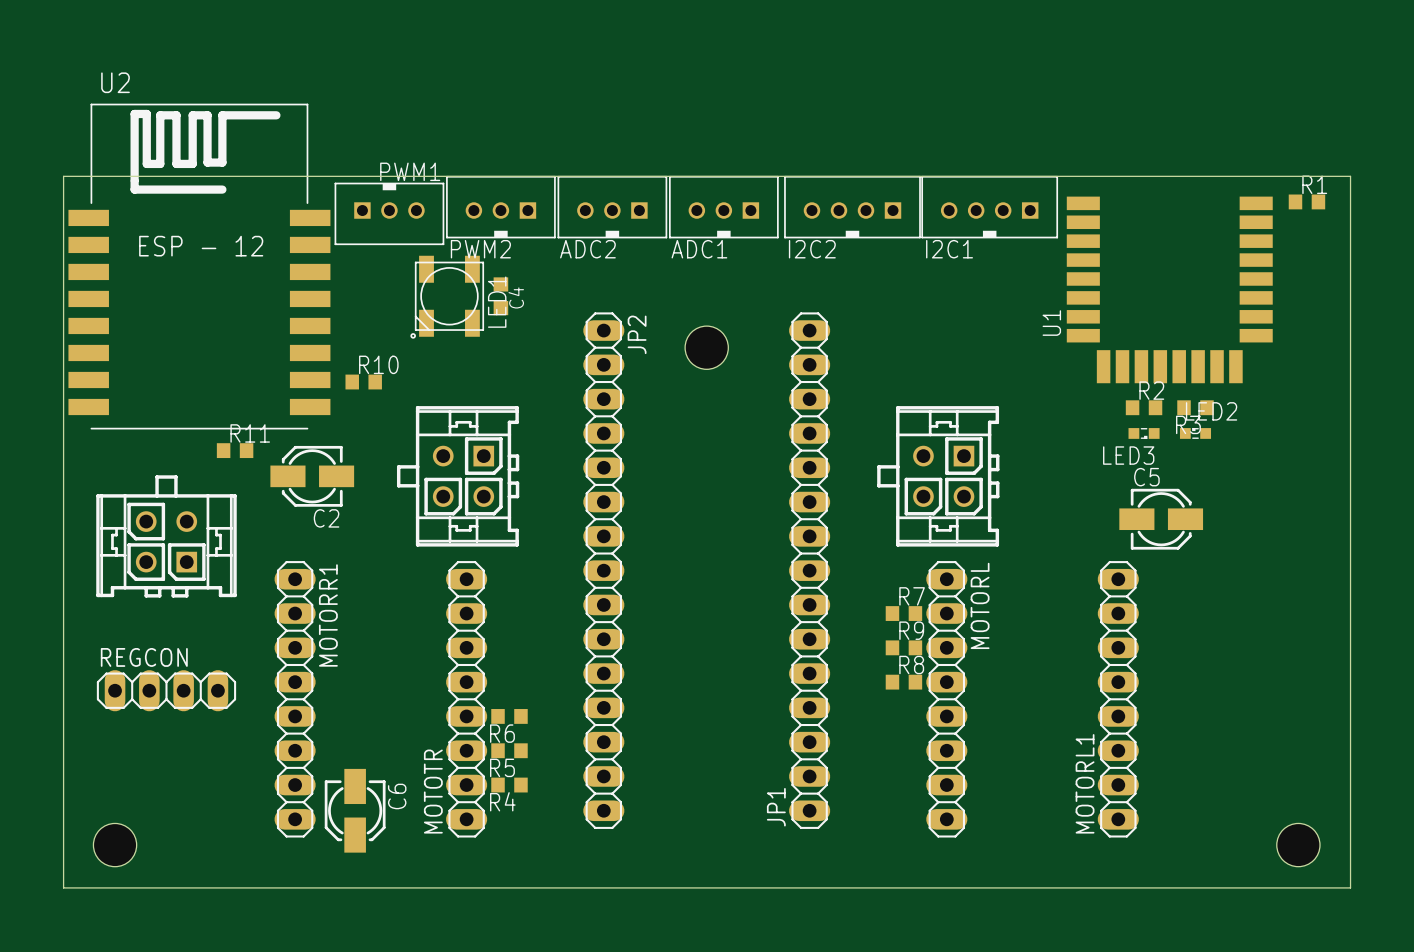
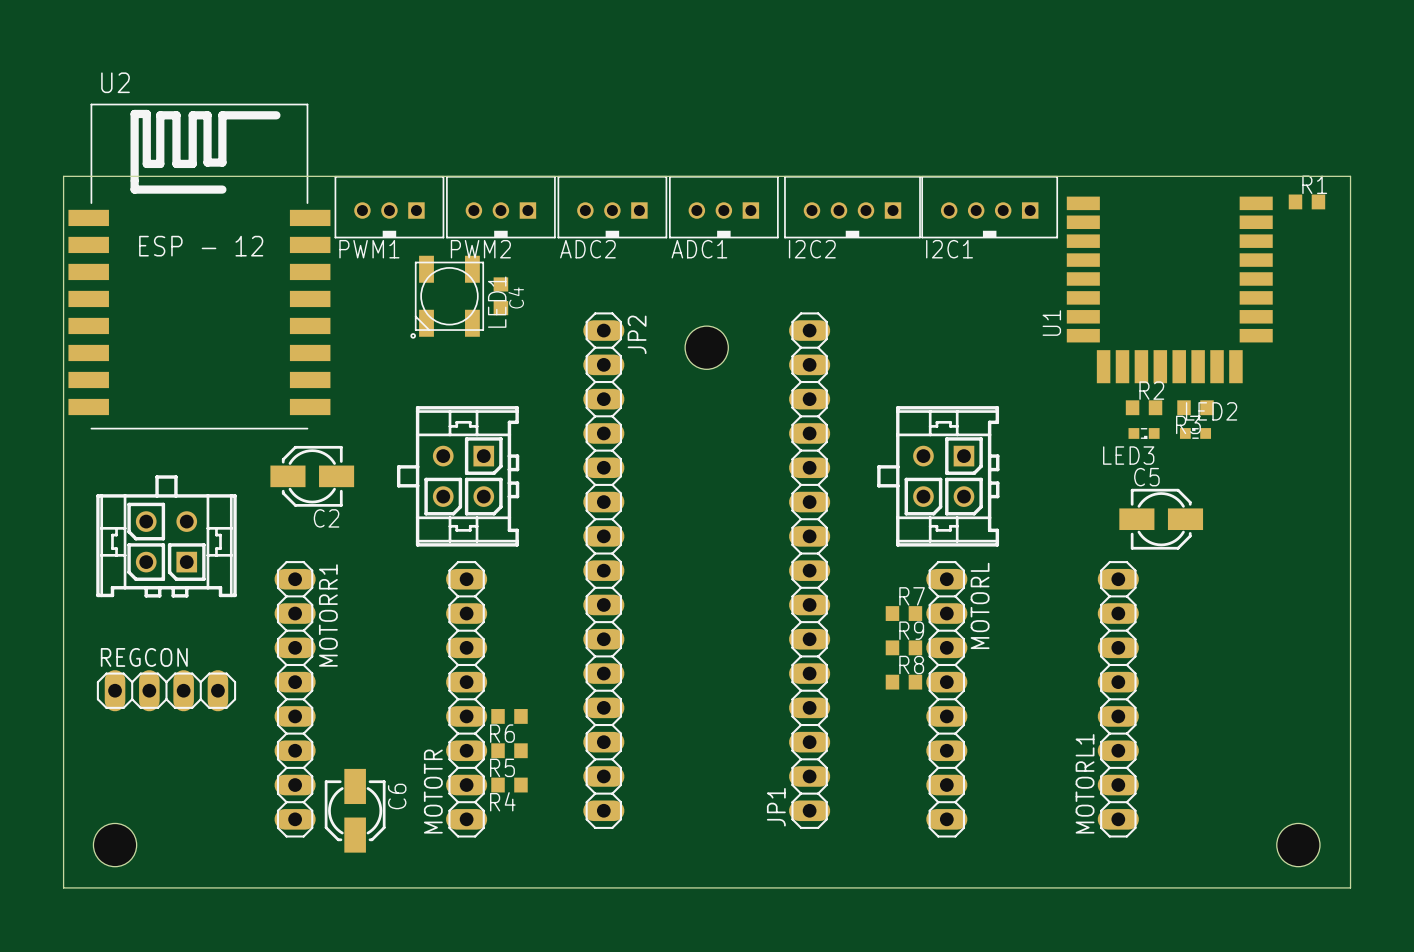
PWM1 rotation: 0° (389, 213) -> 180° (389, 207)
R10: (363, 382) -> none
R11: (235, 450) -> none

